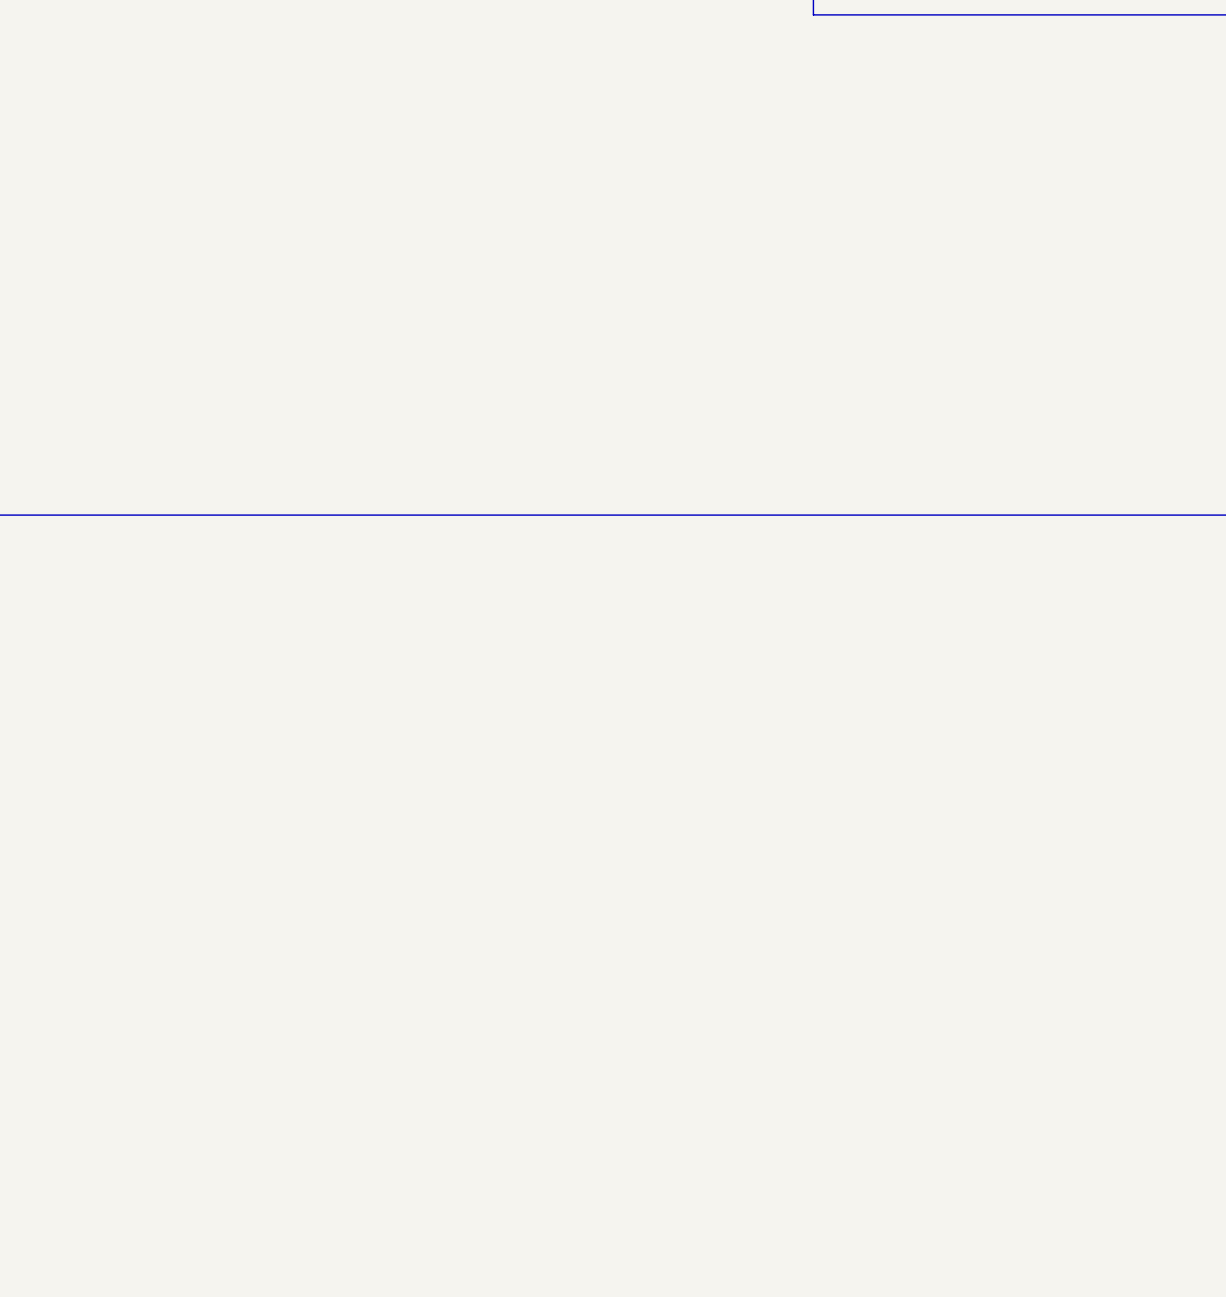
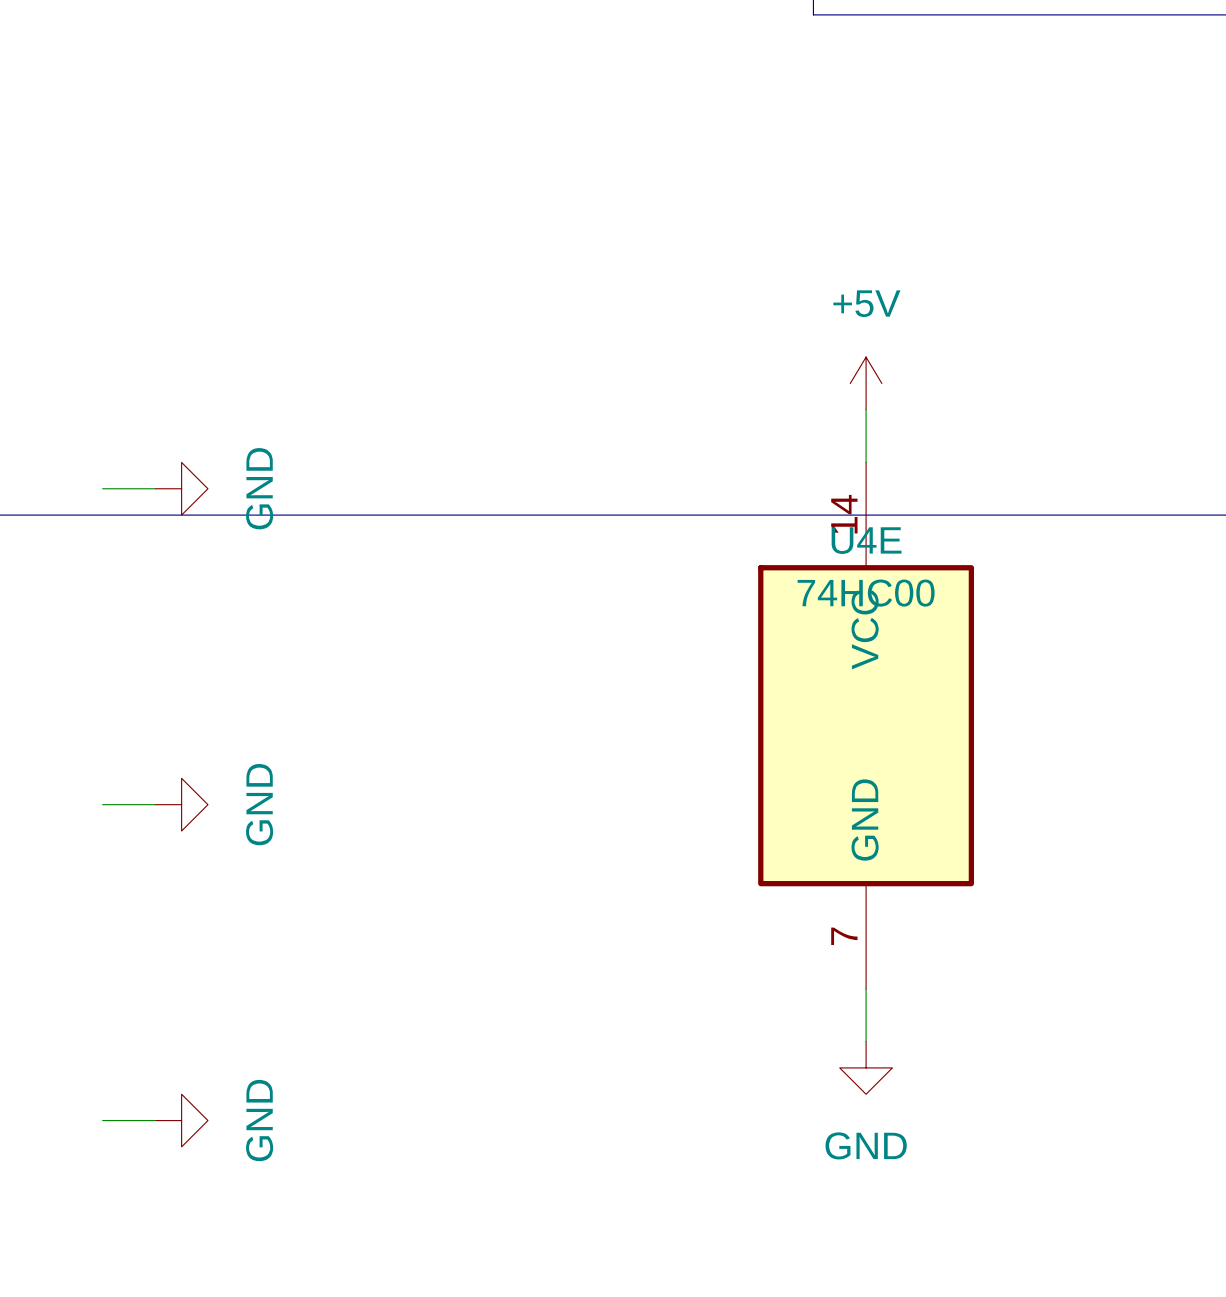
power symbol: none -> +5V (866, 383)
wire: none -> (866, 409) (866, 462)
wire: none -> (102, 488) (155, 488)
power symbol: none -> GND (181, 488)
U4E: none -> 74HC00 (866, 725)
wire: none -> (102, 804) (155, 804)
power symbol: none -> GND (181, 804)
wire: none -> (866, 988) (866, 1041)
power symbol: none -> GND (866, 1067)
wire: none -> (102, 1120) (155, 1120)
power symbol: none -> GND (181, 1120)

